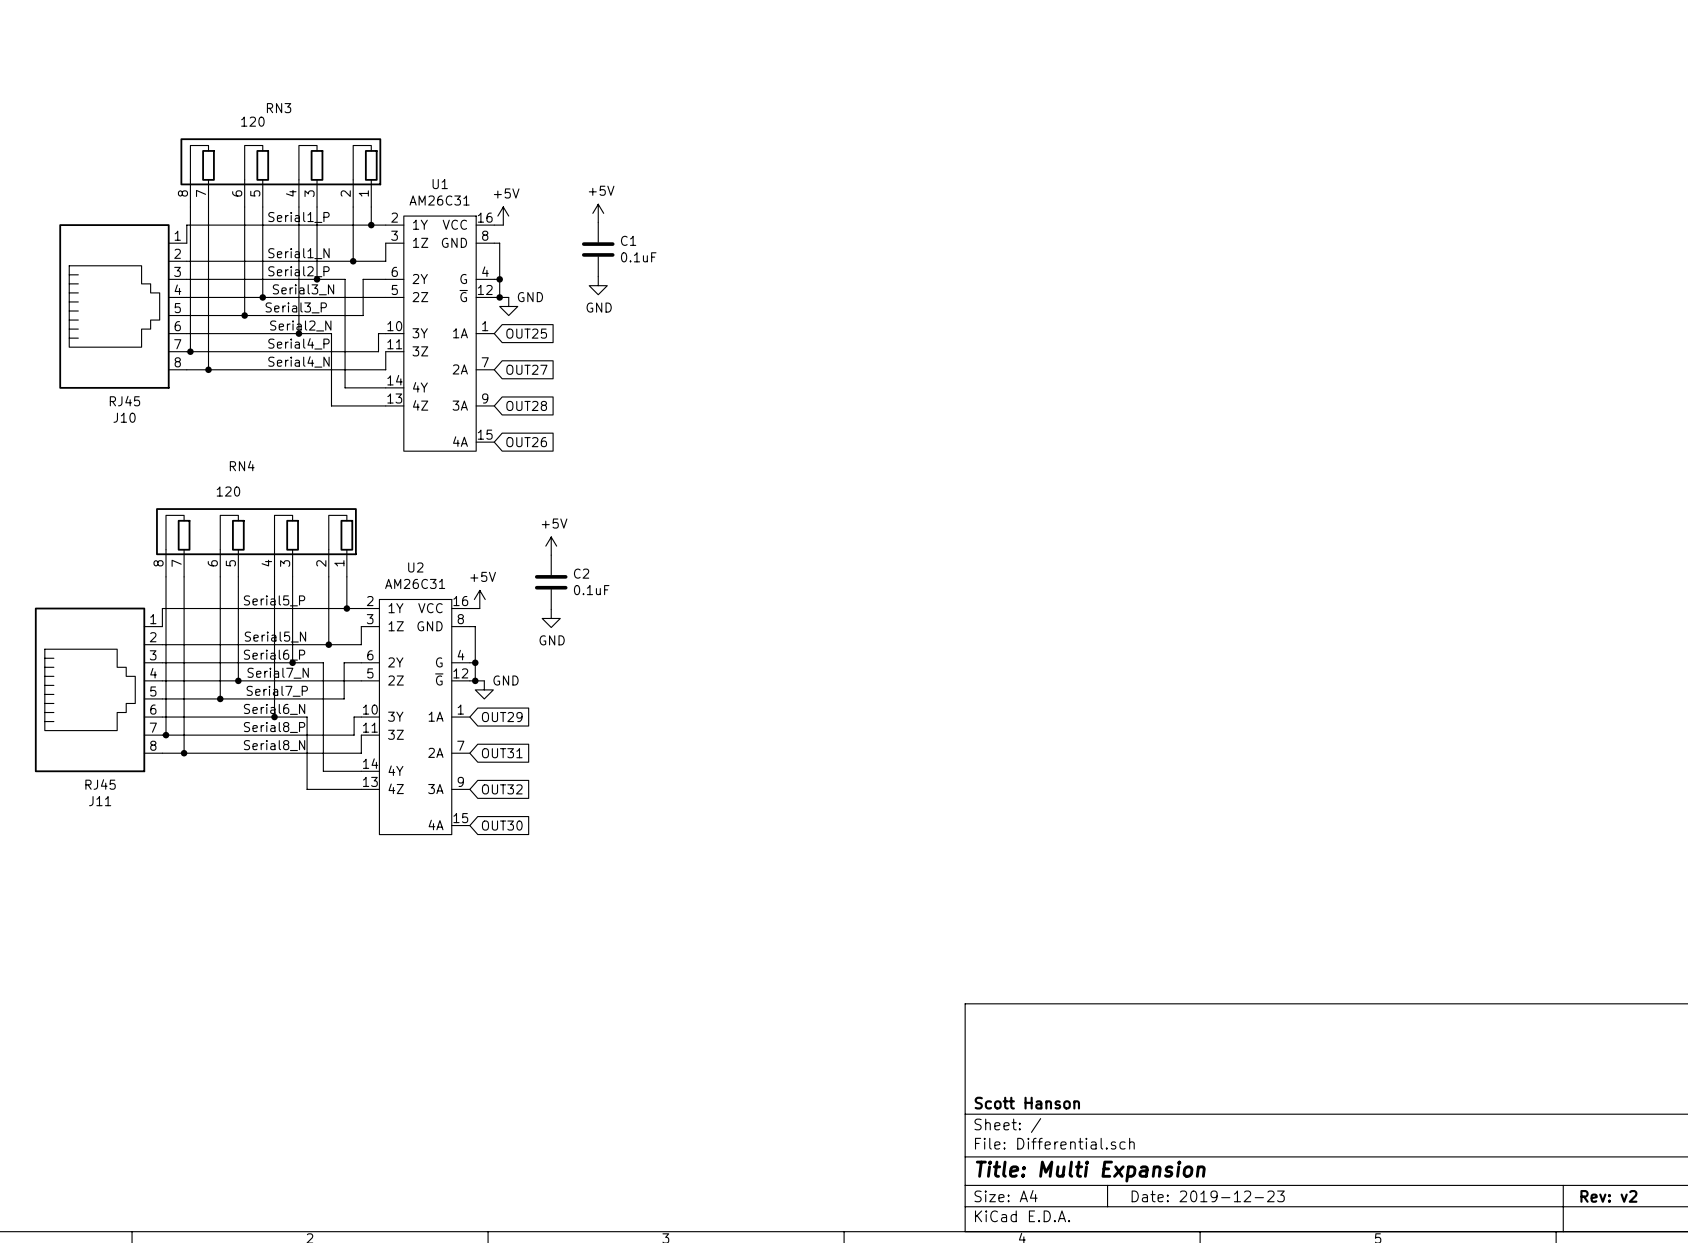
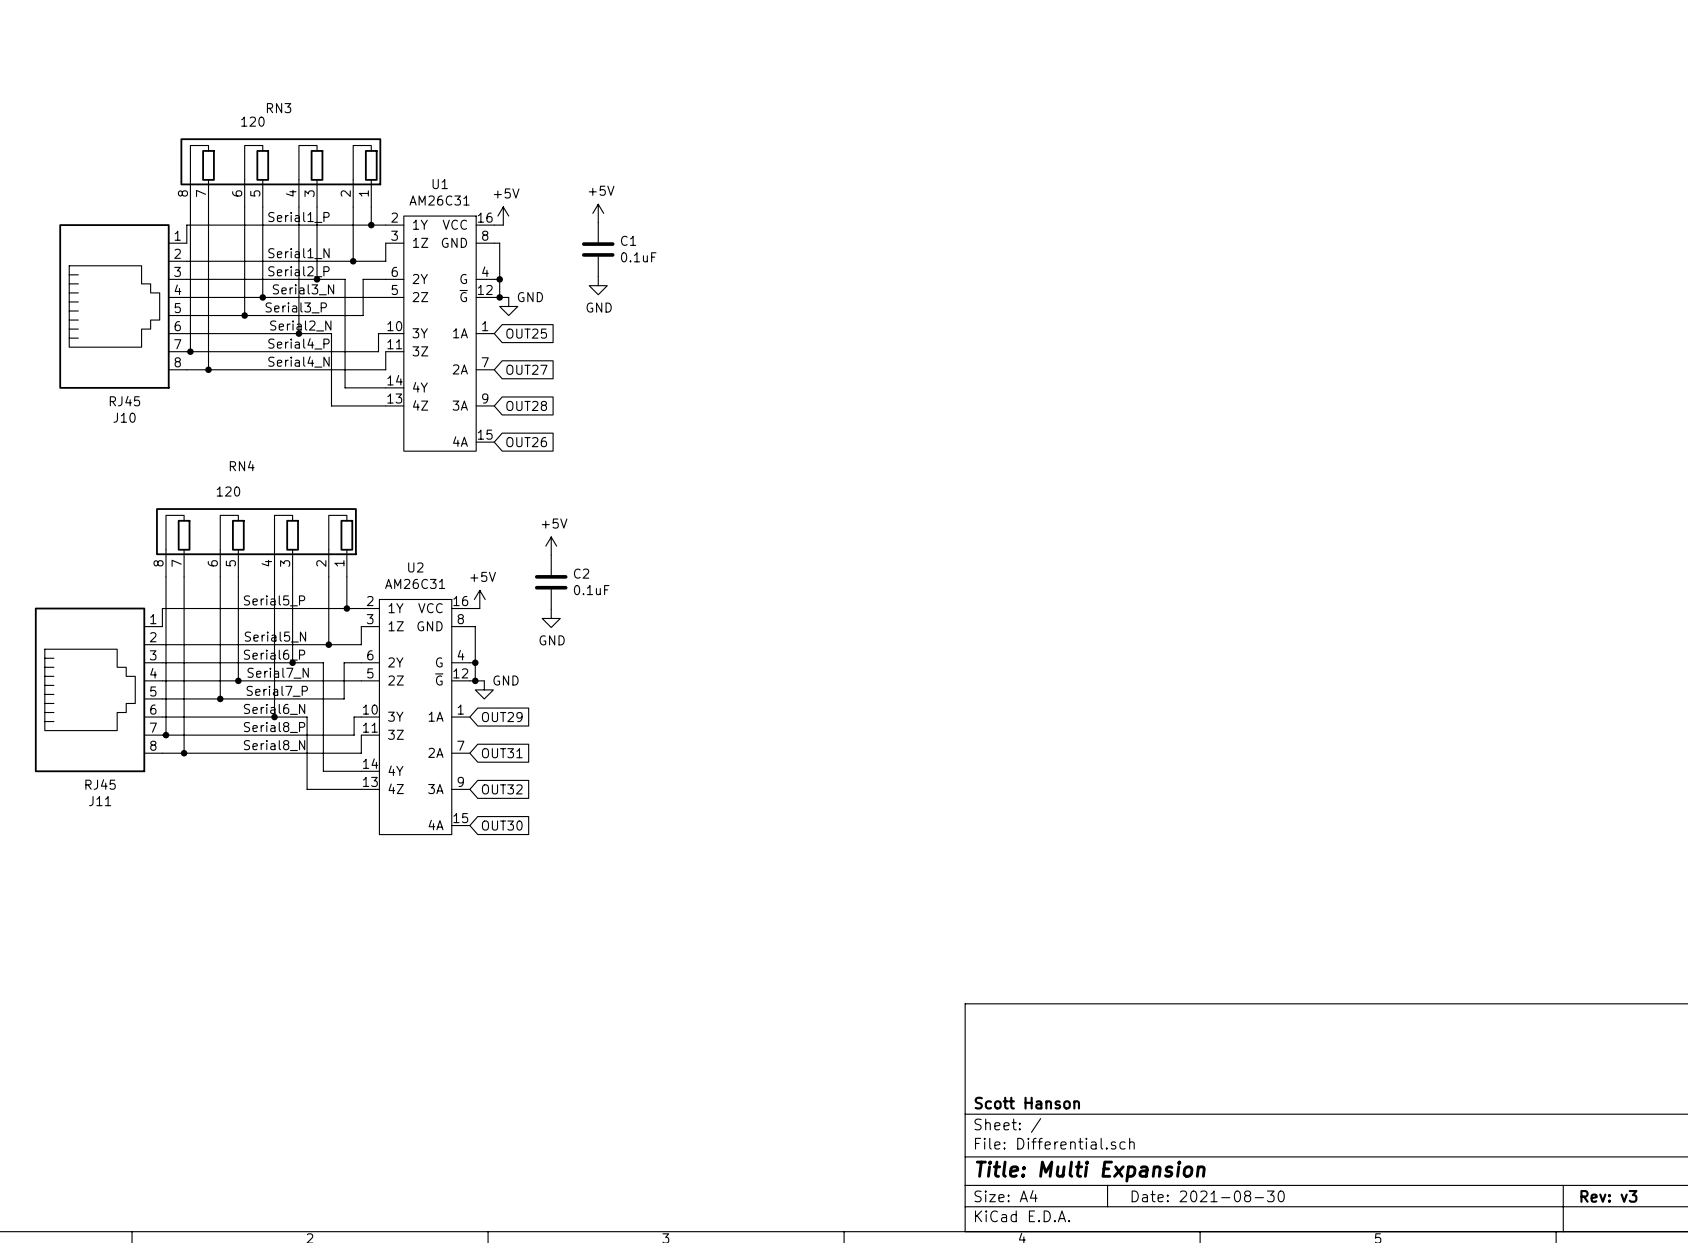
title block: Date: 2019-12-23 (1208, 1196) -> Date: 2021-08-30 (1208, 1196)
title block: Rev: v2 (1608, 1196) -> Rev: v3 (1608, 1196)

